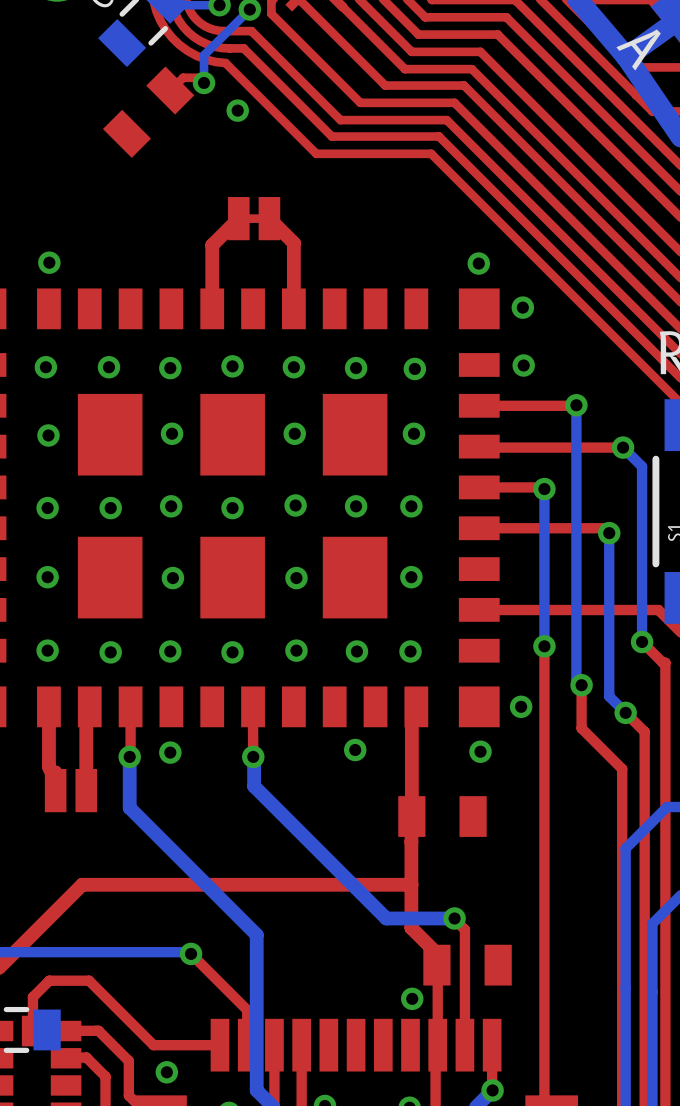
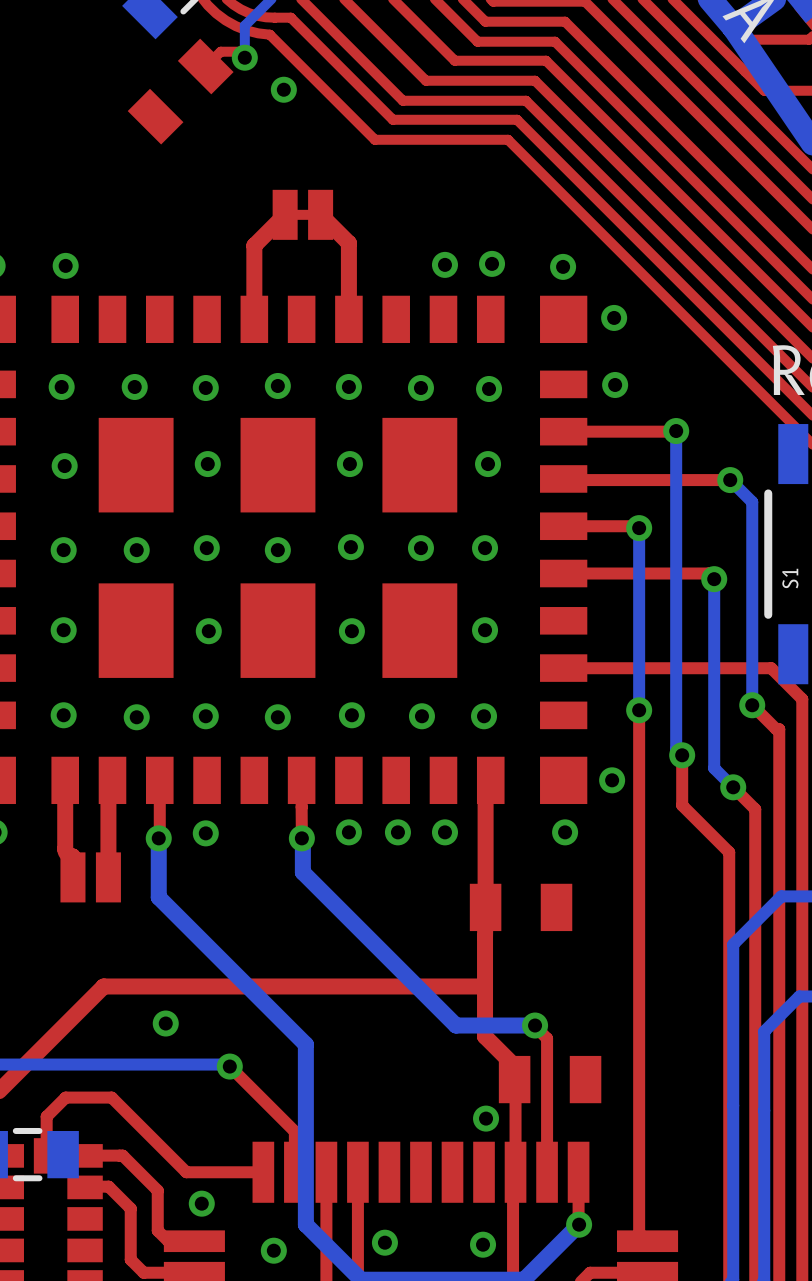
via: none -> (492, 263)
via: none -> (444, 264)
via: (355, 750) -> none
via: none -> (348, 832)
via: none -> (397, 832)
via: none -> (444, 832)
via: none -> (165, 1023)

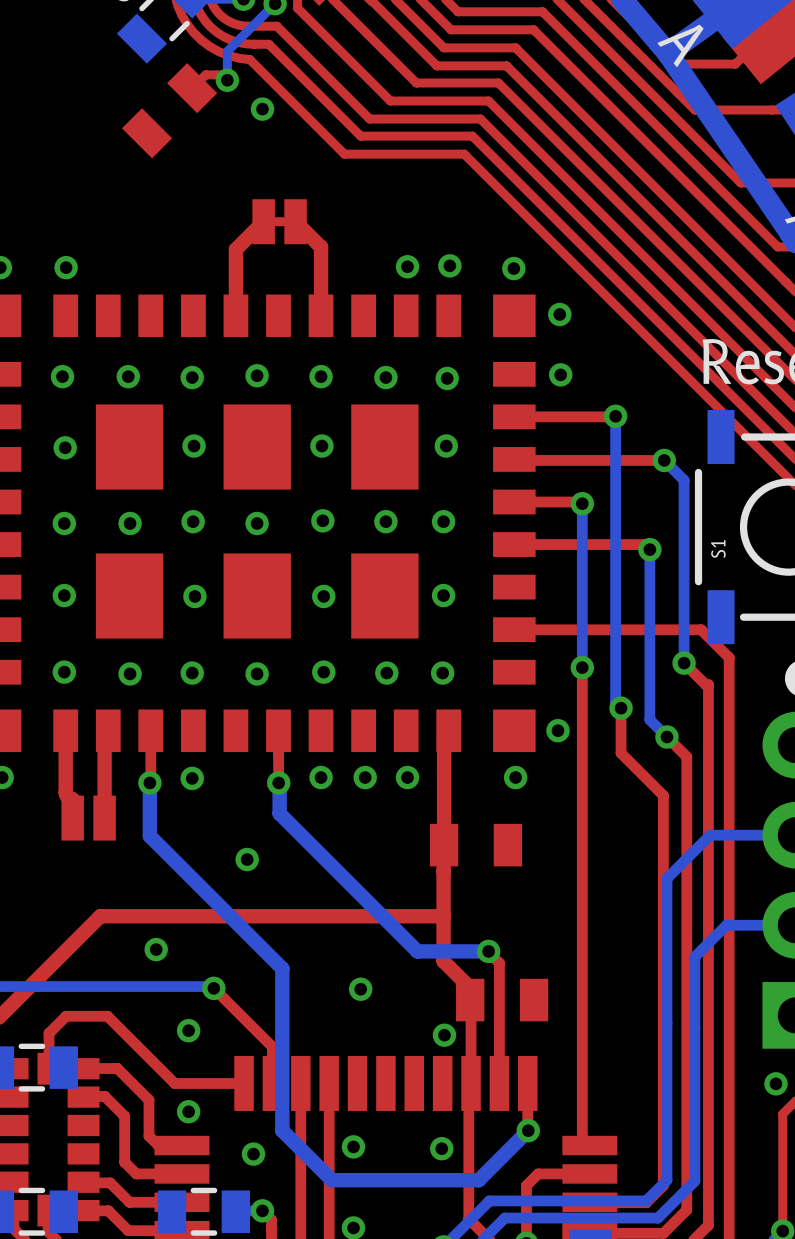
via: none -> (247, 859)
via: none -> (360, 989)
via: none -> (188, 1030)

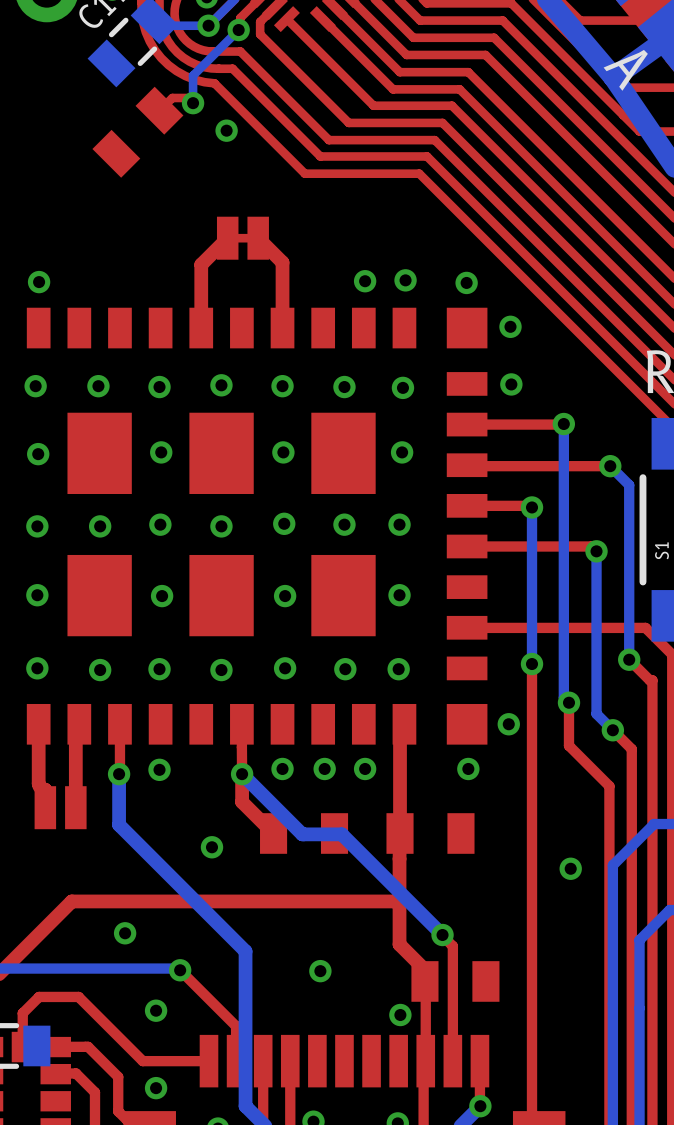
top track: none -> (242, 774) (242, 802) (273, 833)
bottom track: (279, 783) (279, 813) (417, 951) (488, 951) -> (242, 775) (302, 834) (341, 834) (442, 935)
part: none -> (304, 833)
via: none -> (570, 868)

